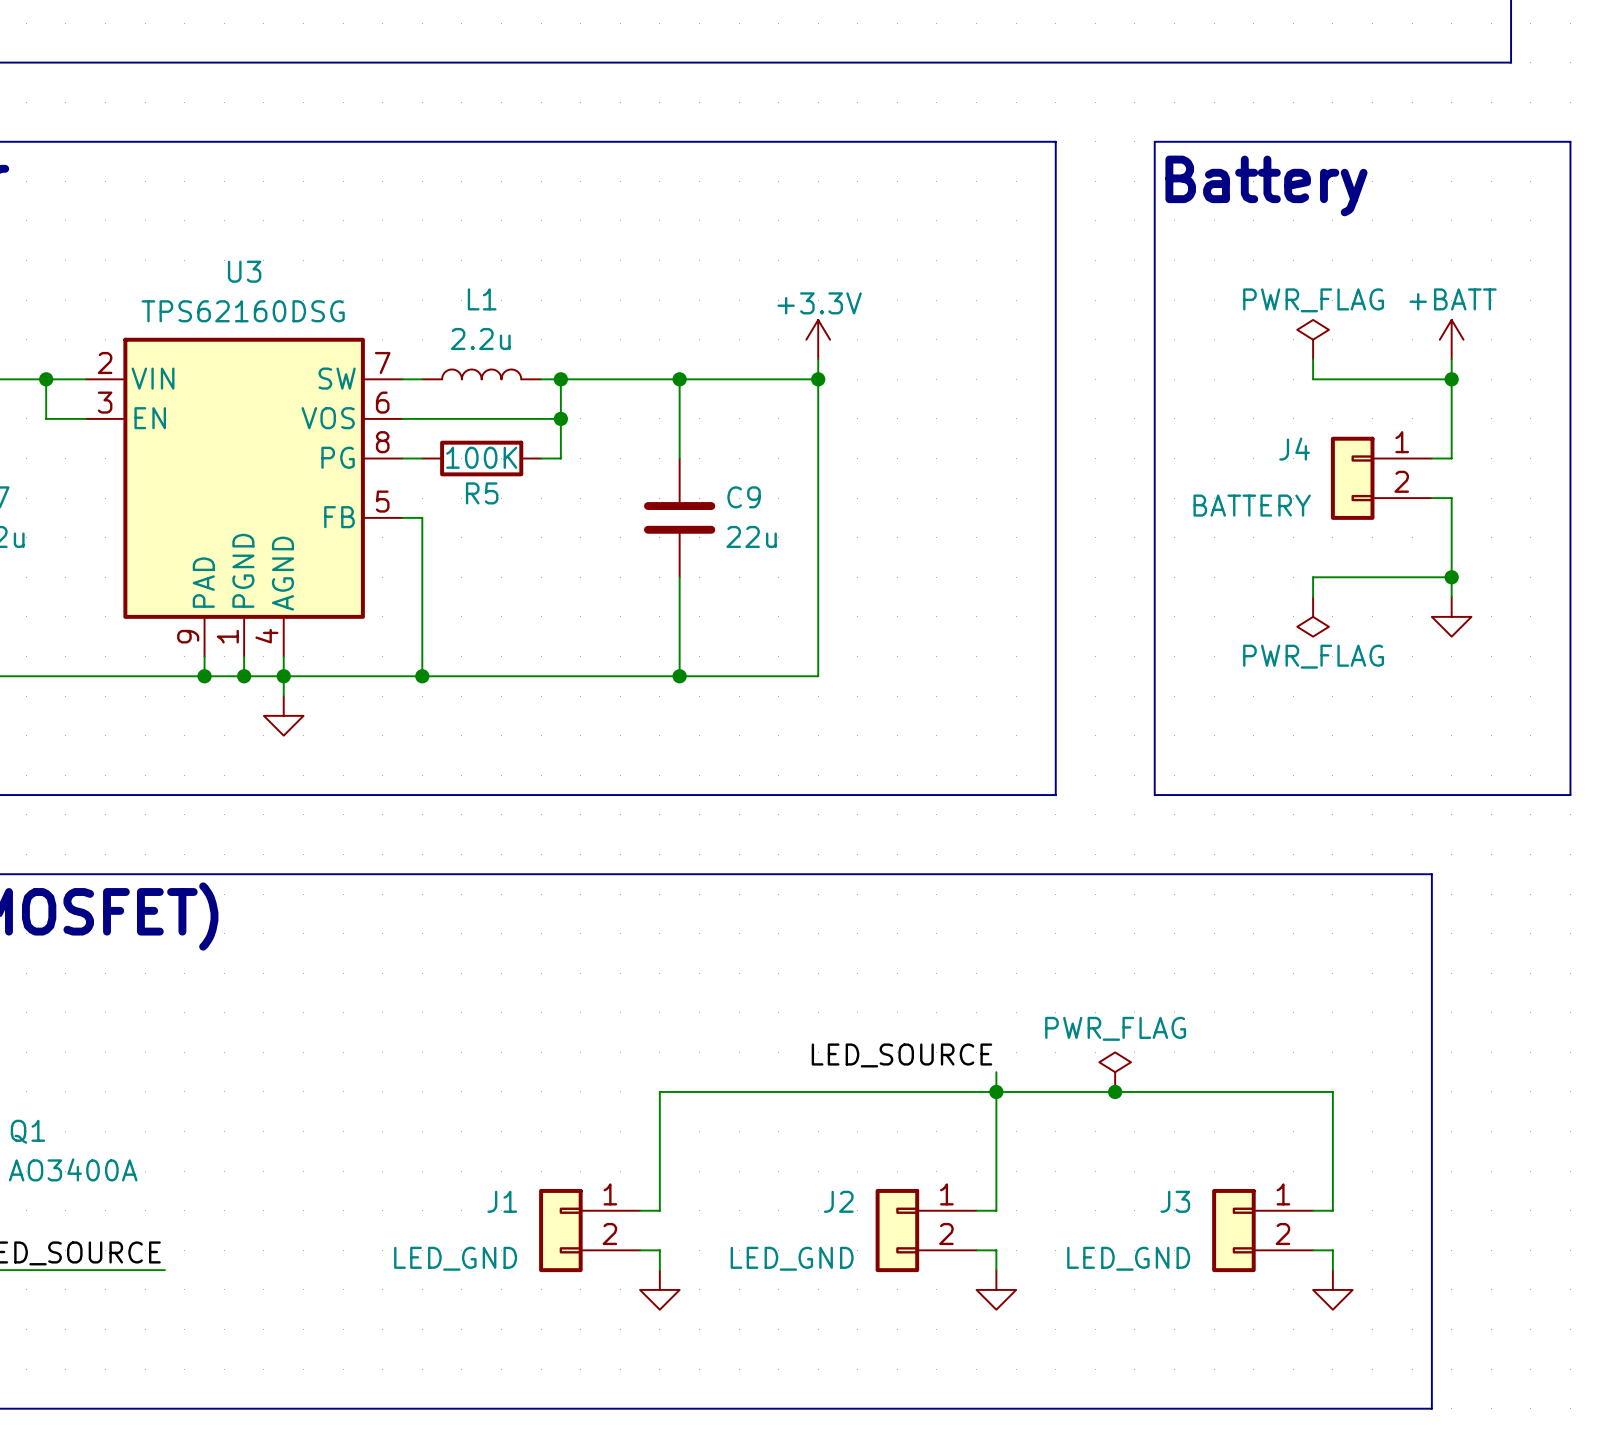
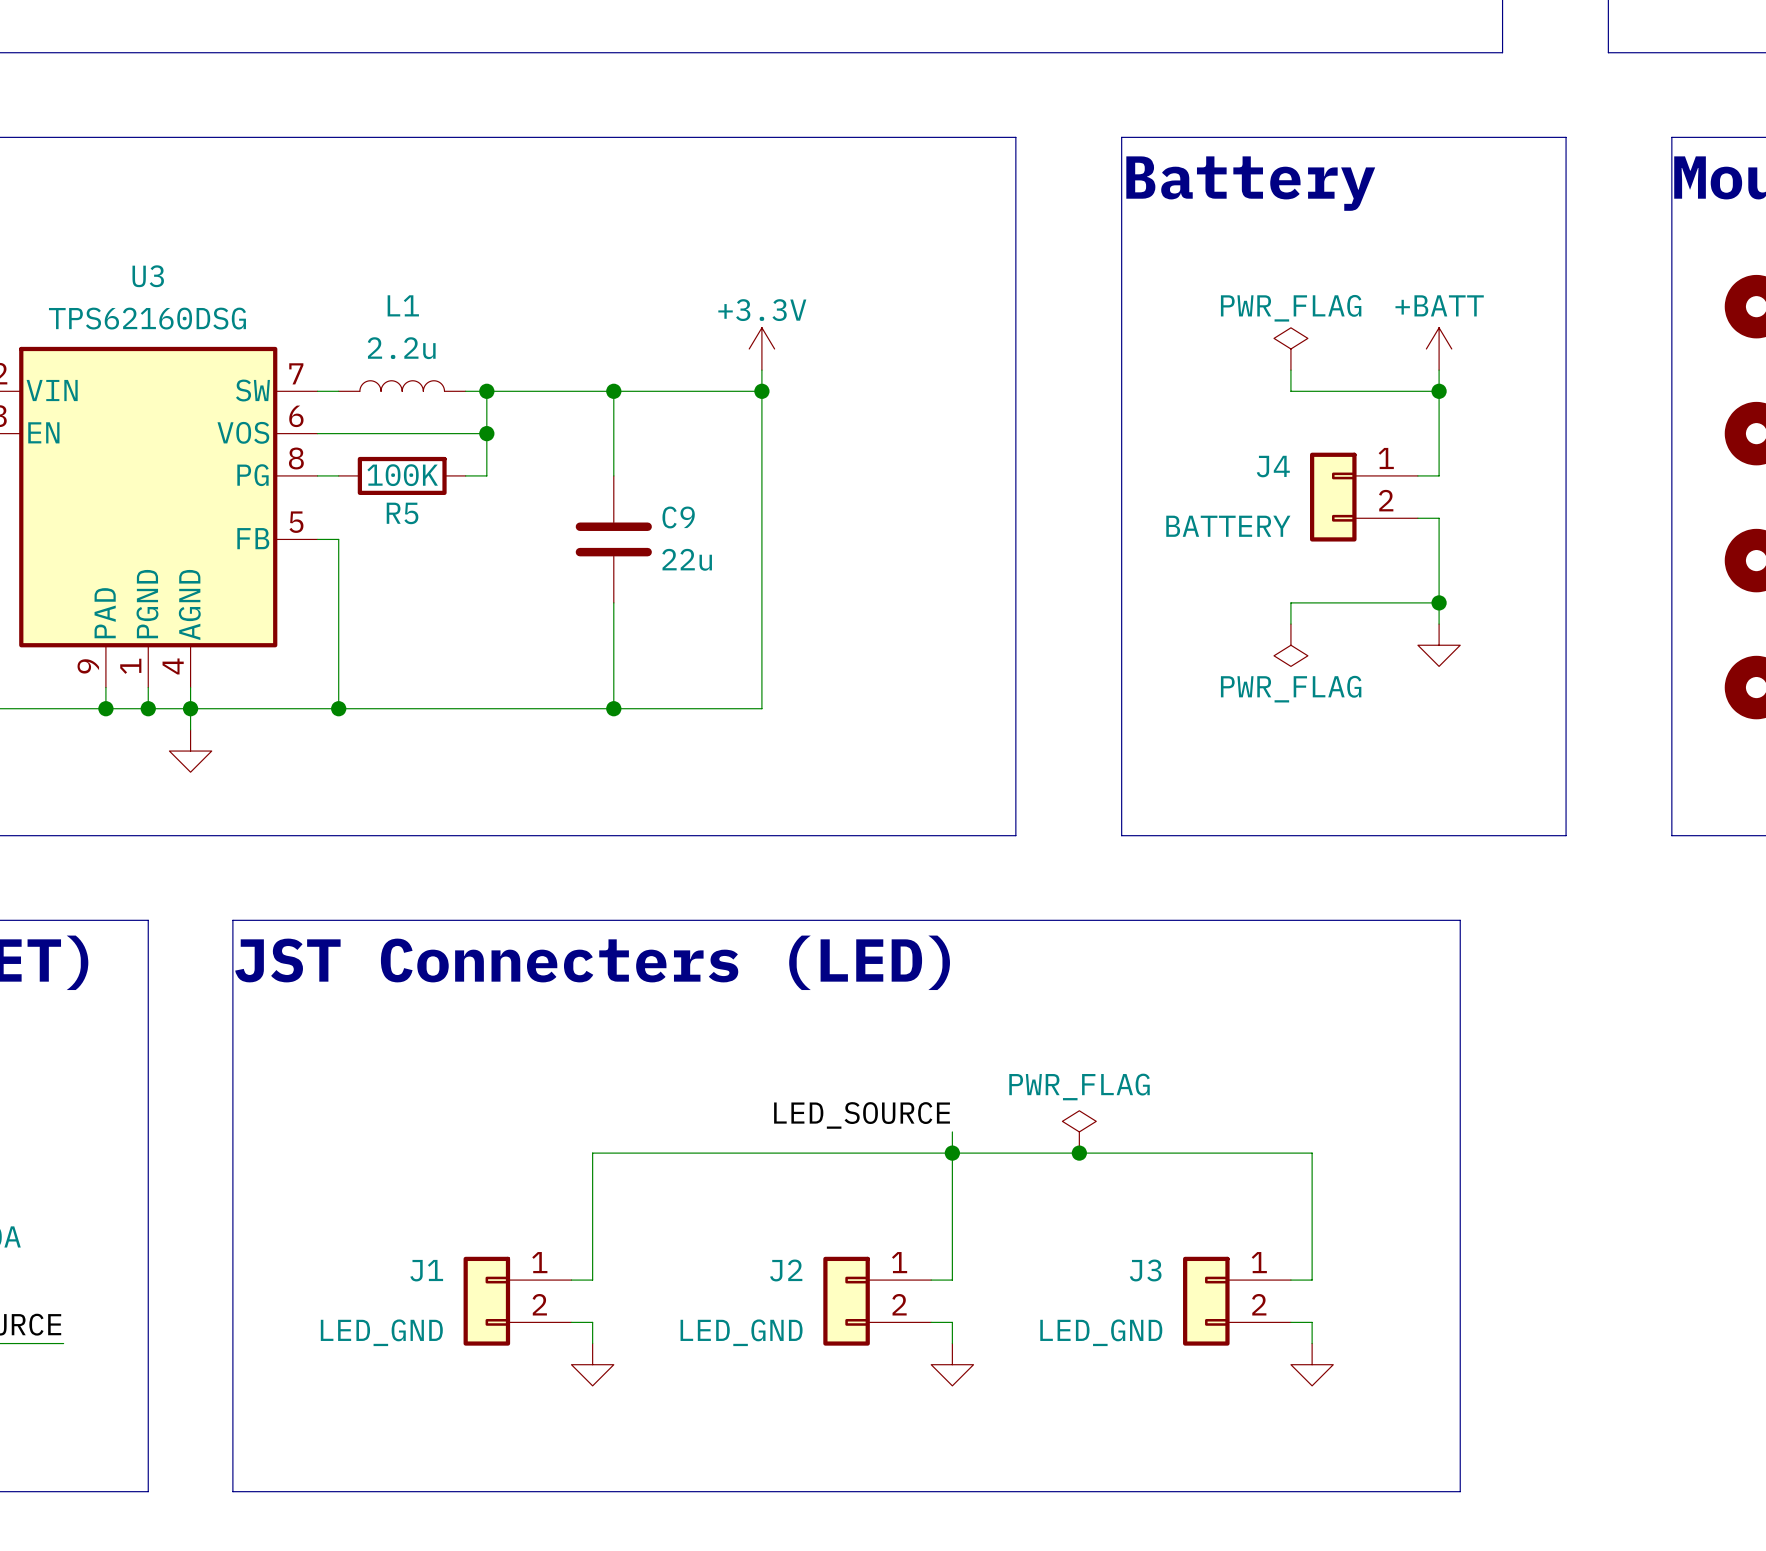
line: (244, 874) (323, 874) -> (148, 920) (148, 1491)
line: (1431, 874) (1431, 1408) -> (1417, 920) (1460, 920) (1460, 1491) (1417, 1491)
text: none -> JST Connecters (LED) (592, 962)
line: (244, 1408) (323, 1408) -> (232, 920) (232, 1491)

